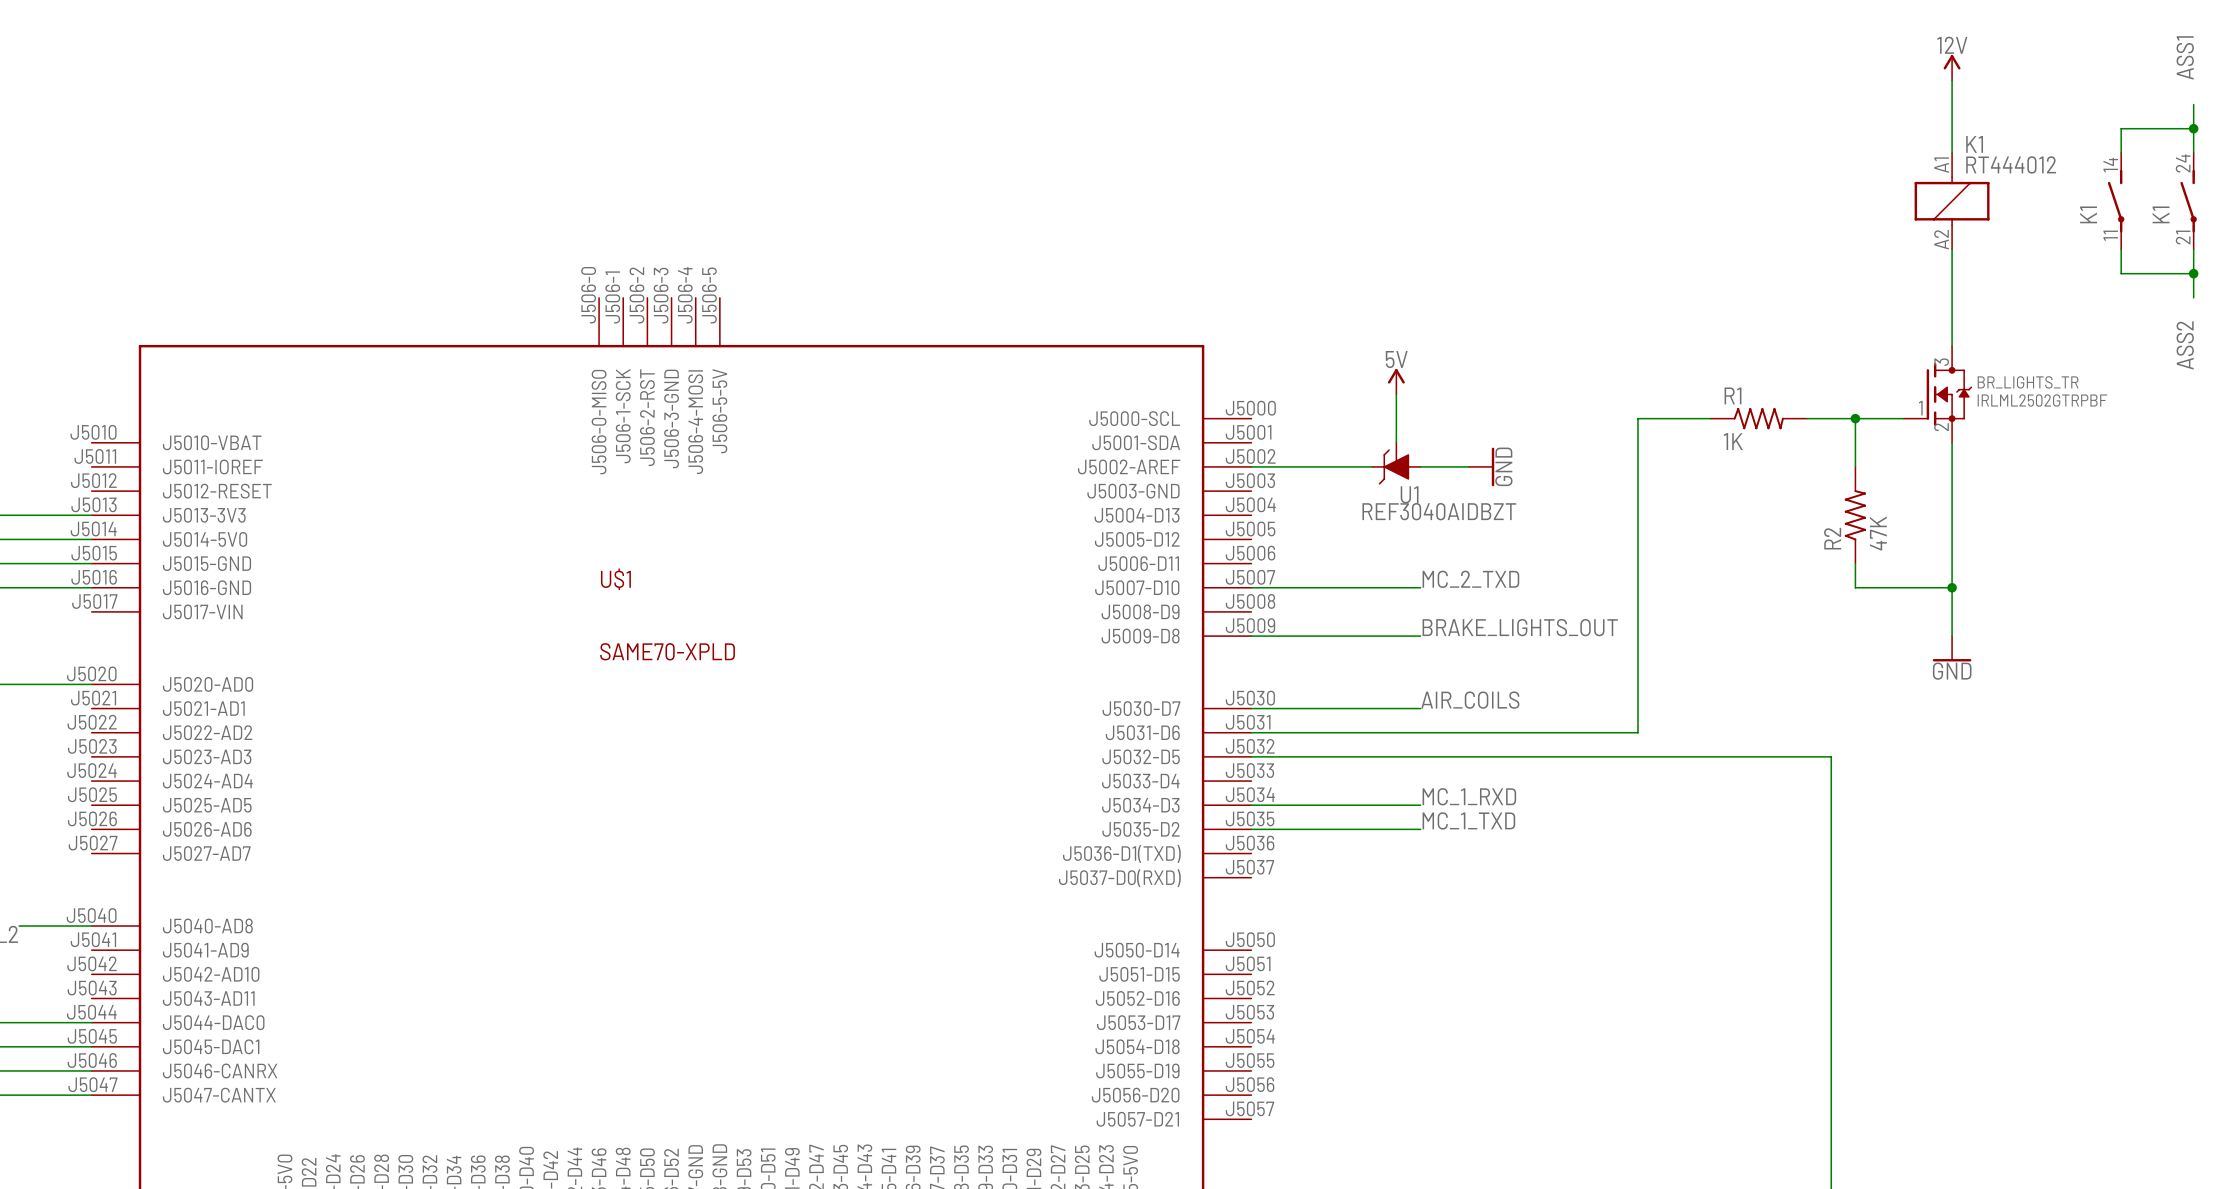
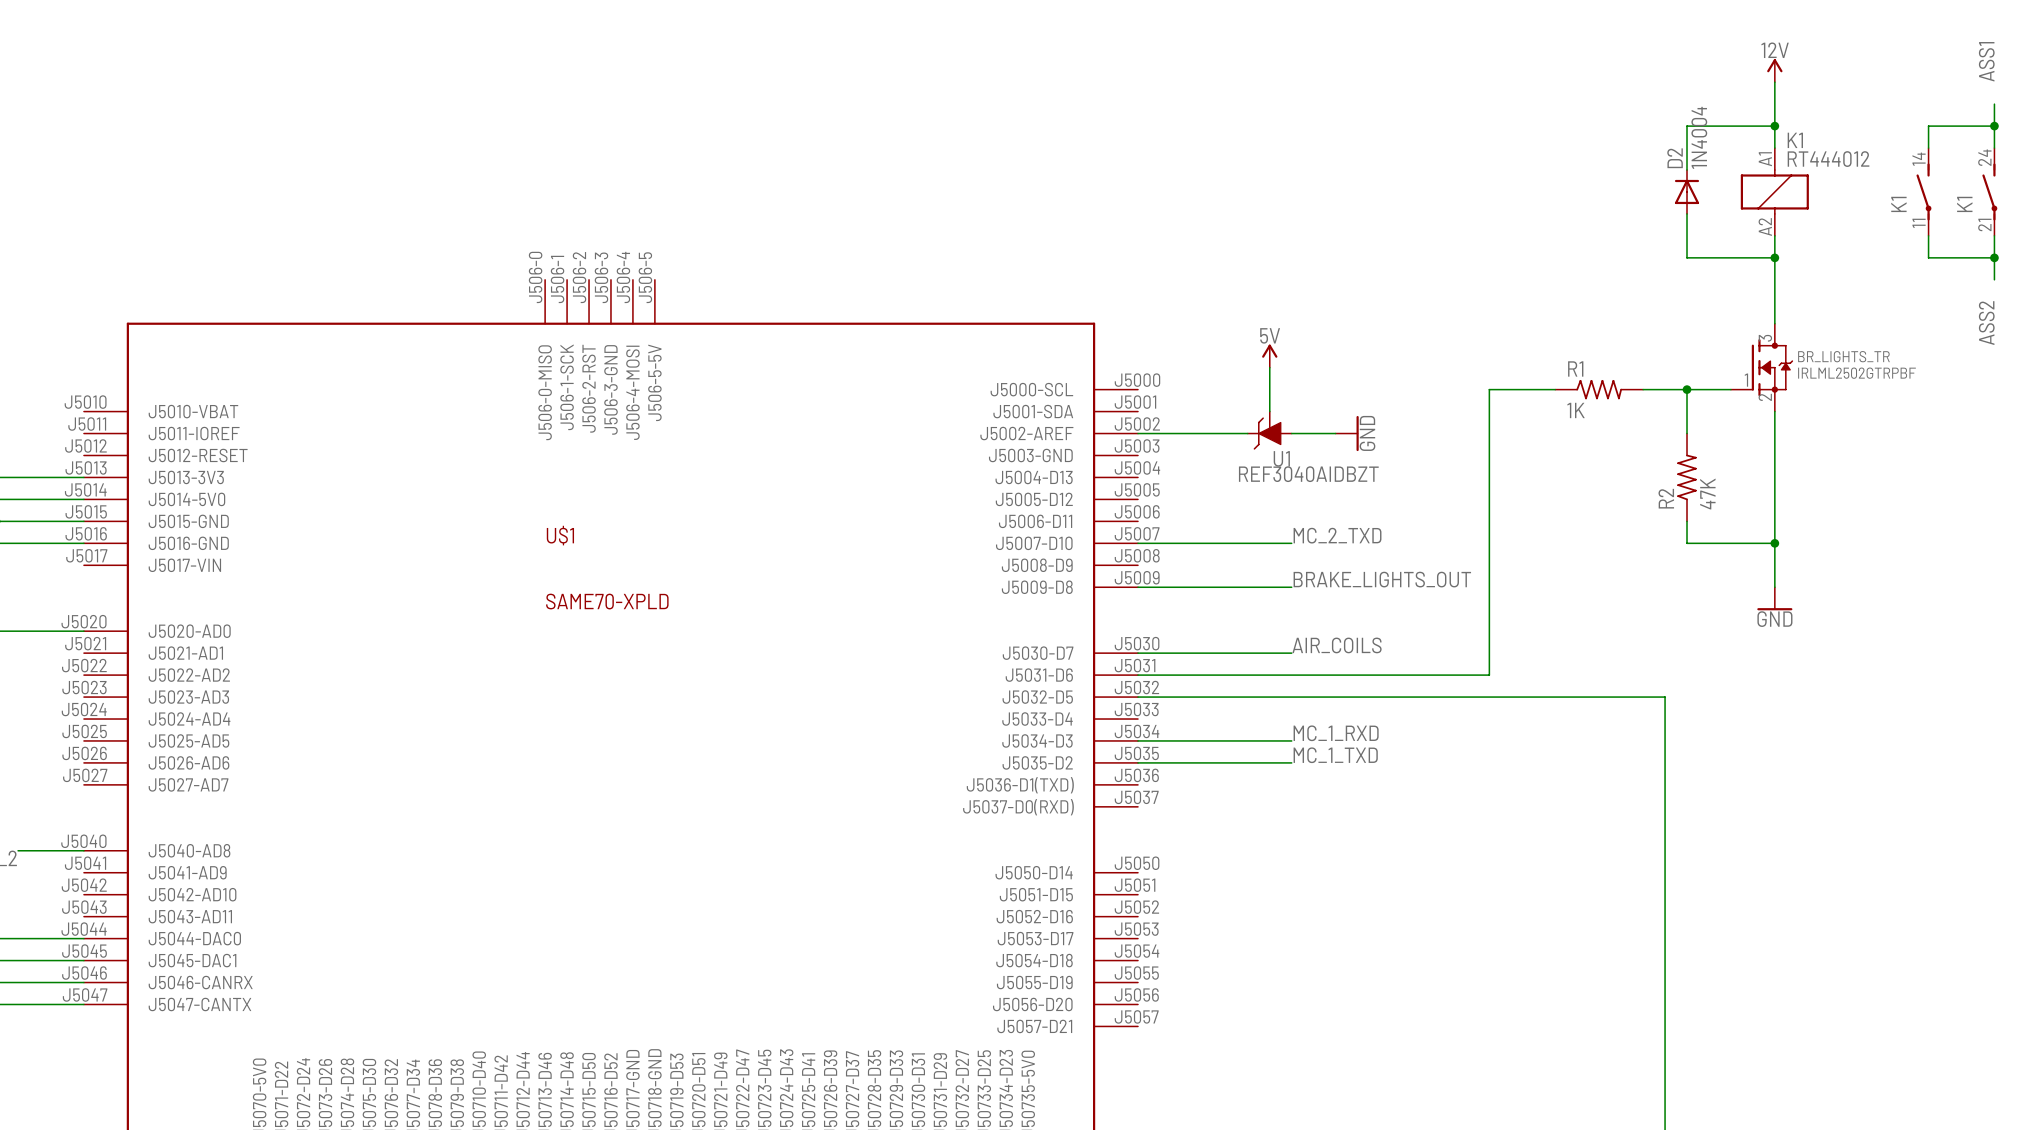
wire: none -> (1774, 126) (1687, 126) (1687, 170)
junction: none -> (1774, 126)
D2: none -> 1N4004 (1687, 191)
wire: none -> (1687, 213) (1687, 257) (1774, 257)
junction: none -> (1774, 257)

